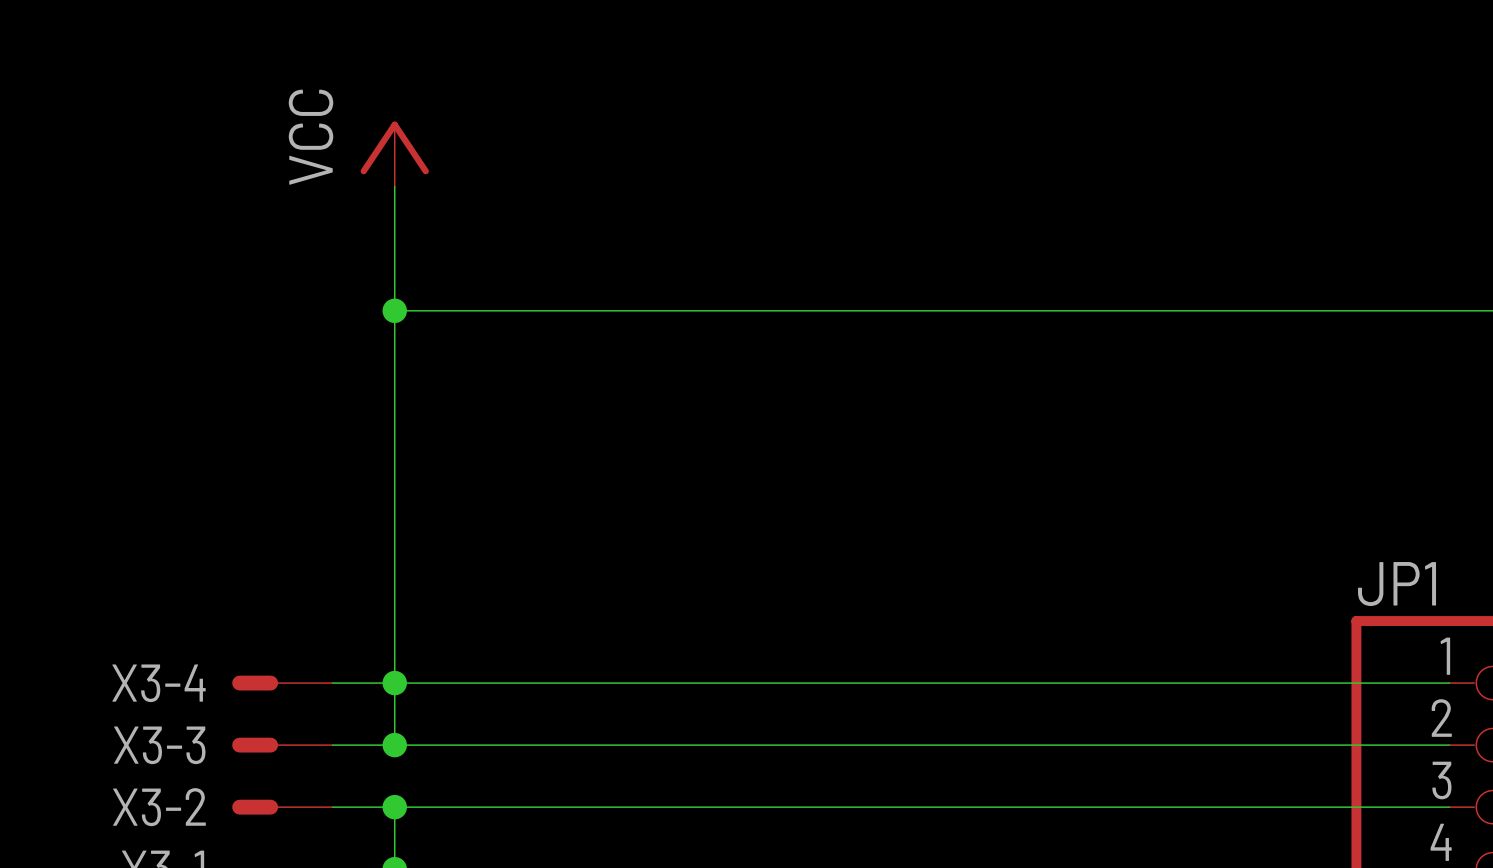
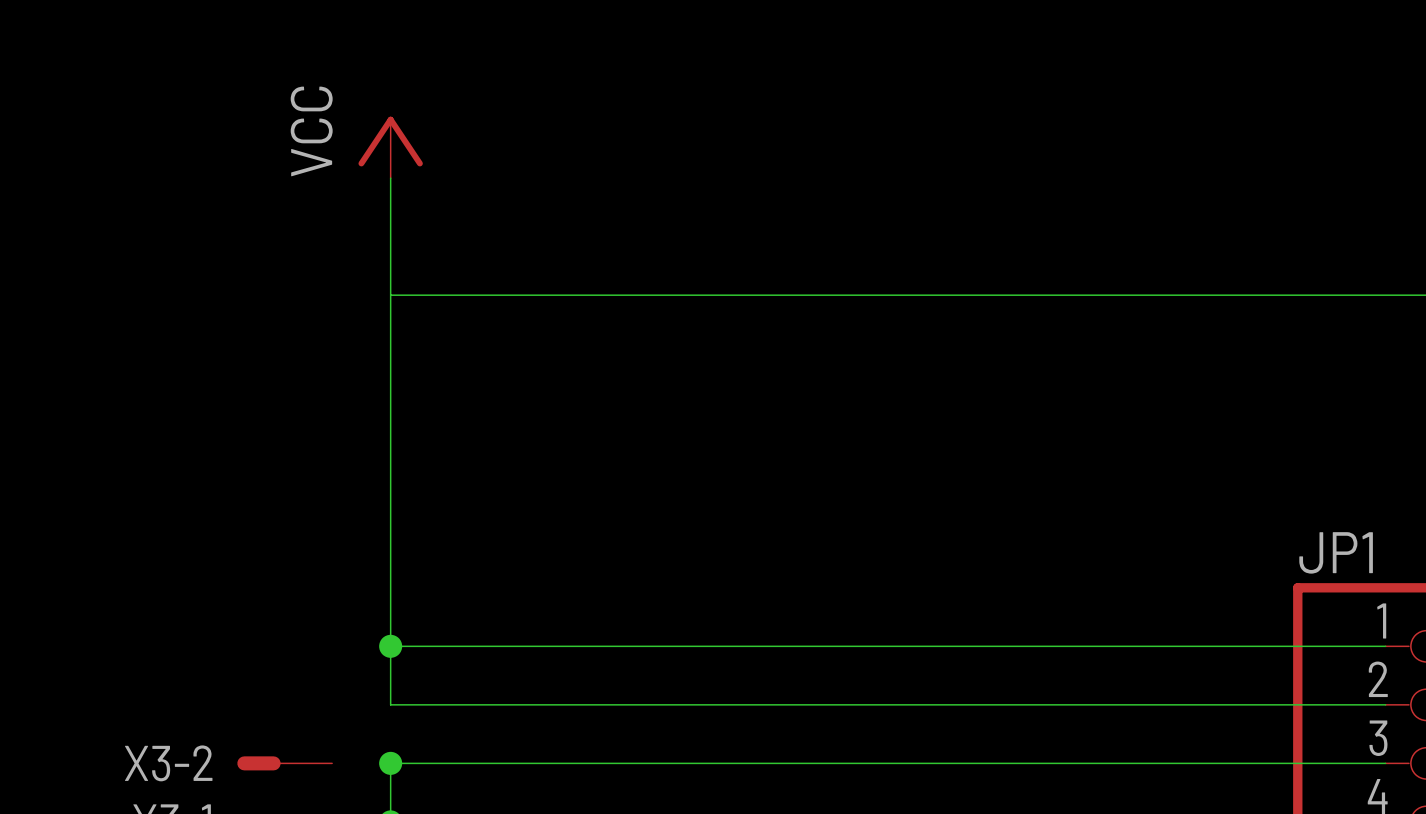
junction: (394, 310) -> none
X3-4: (282, 683) -> none
wire: (332, 683) (394, 683) -> none
X3-3: (282, 745) -> none
wire: (332, 745) (394, 745) -> none
junction: (394, 745) -> none
wire: (332, 807) (394, 807) -> none

